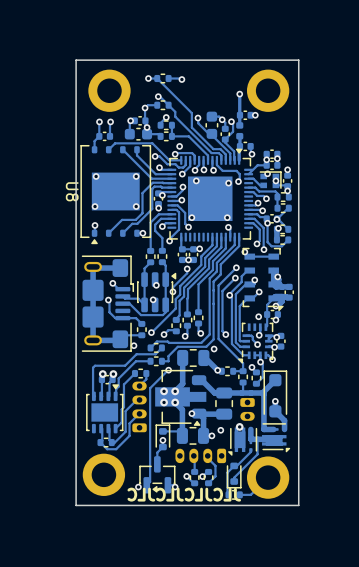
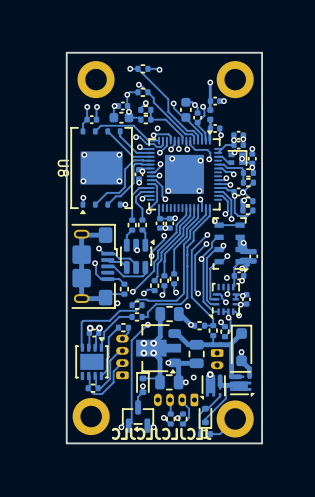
track: (144, 279) (144, 304) -> none
track: (165, 279) (165, 304) -> none
track: none -> (107, 253) (114, 253) (119, 258) (129, 258) (136, 264)
via: (153, 299) -> none

